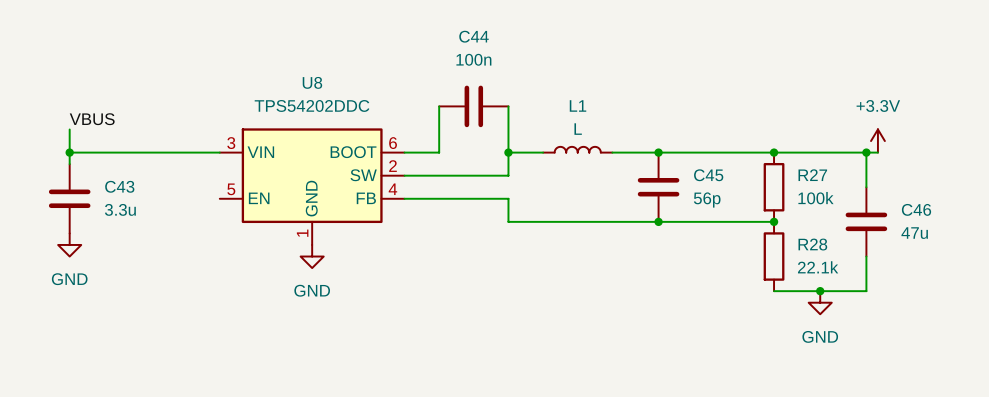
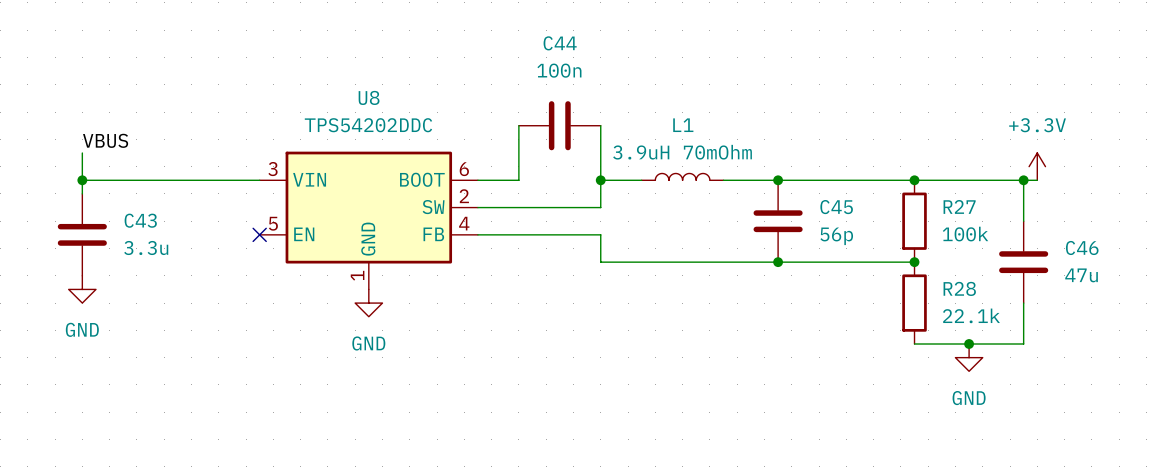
L1 value: L (578, 129) -> 3.9uH 70mOhm (682, 152)
no-connect mark: none -> (259, 234)

